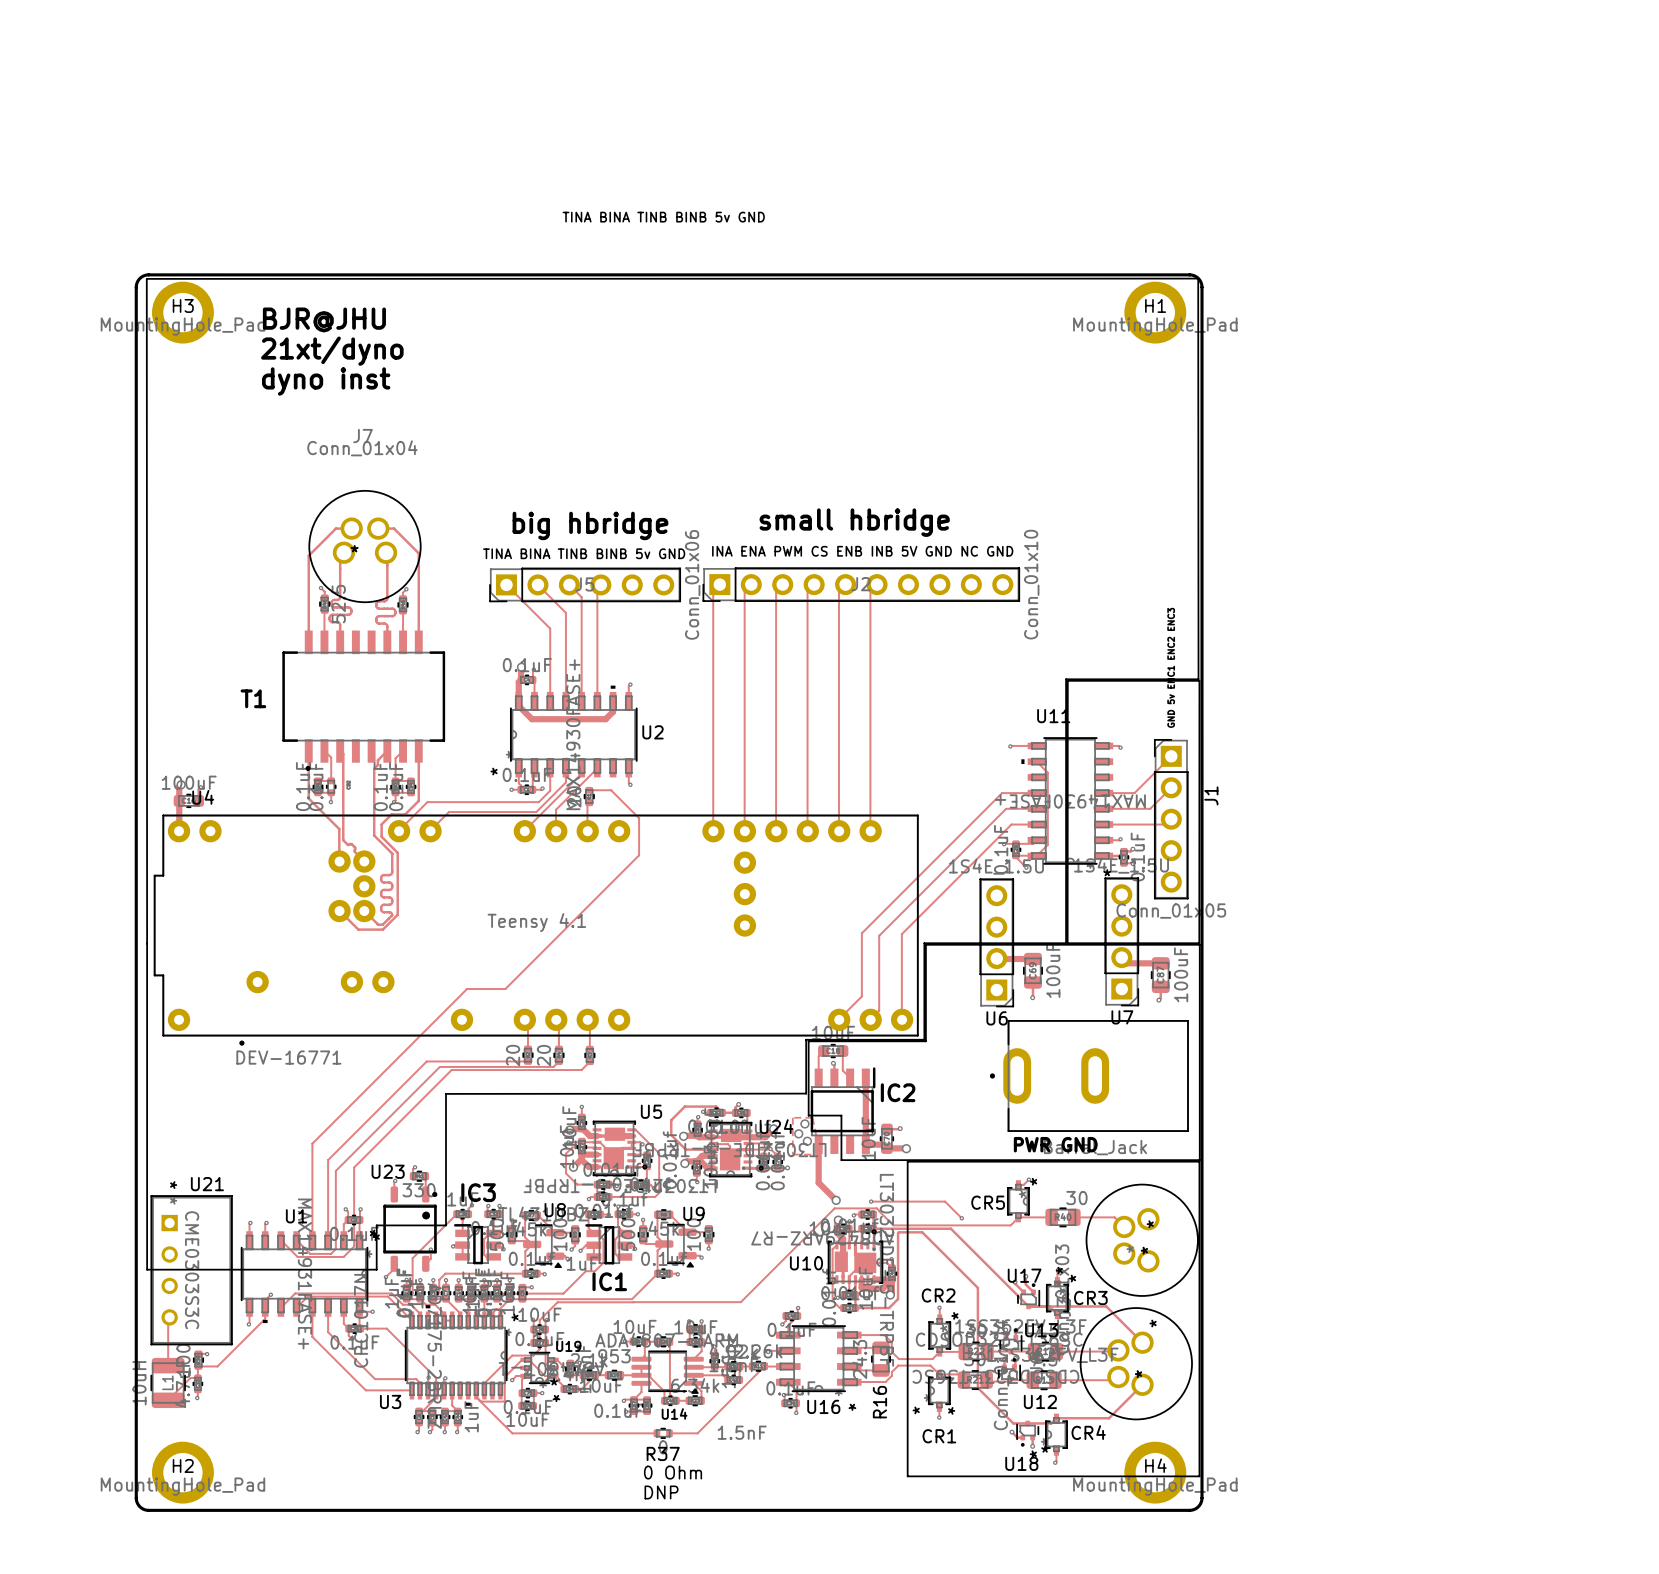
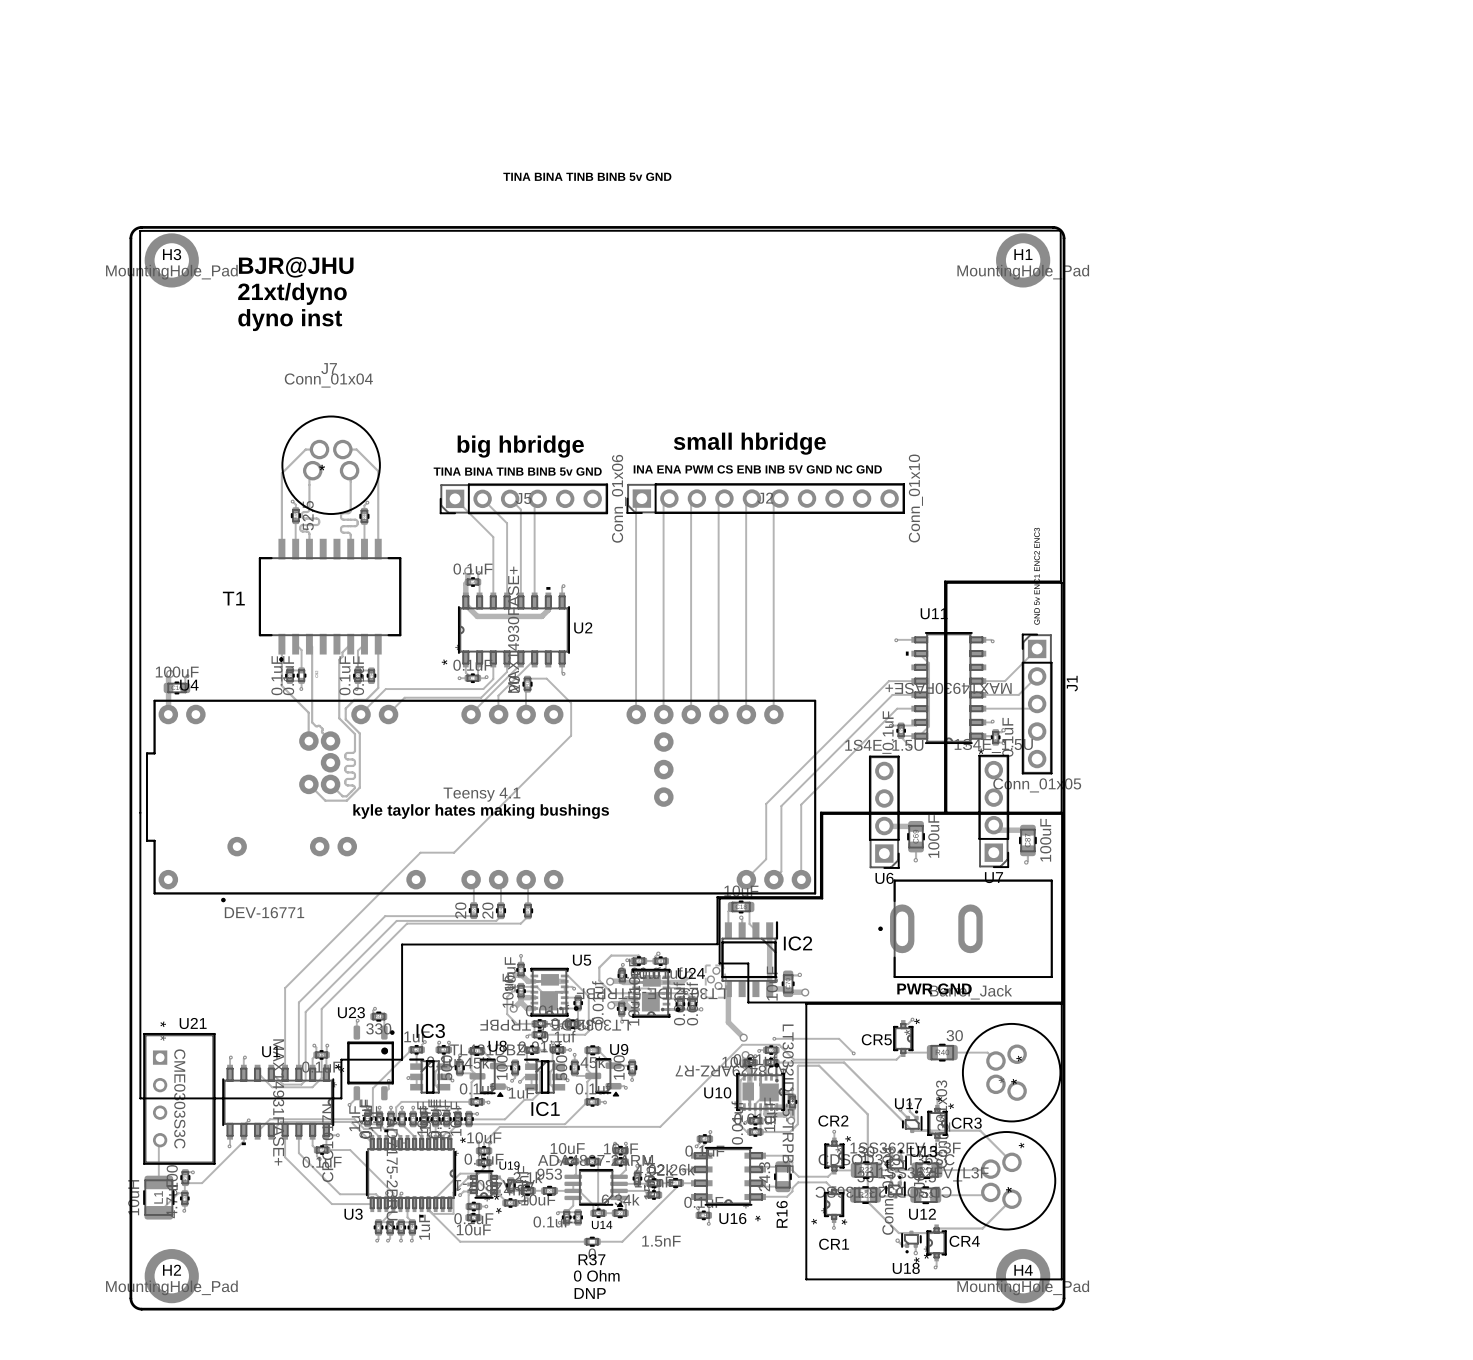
text: none -> kyle taylor hates making bushings (481, 811)

